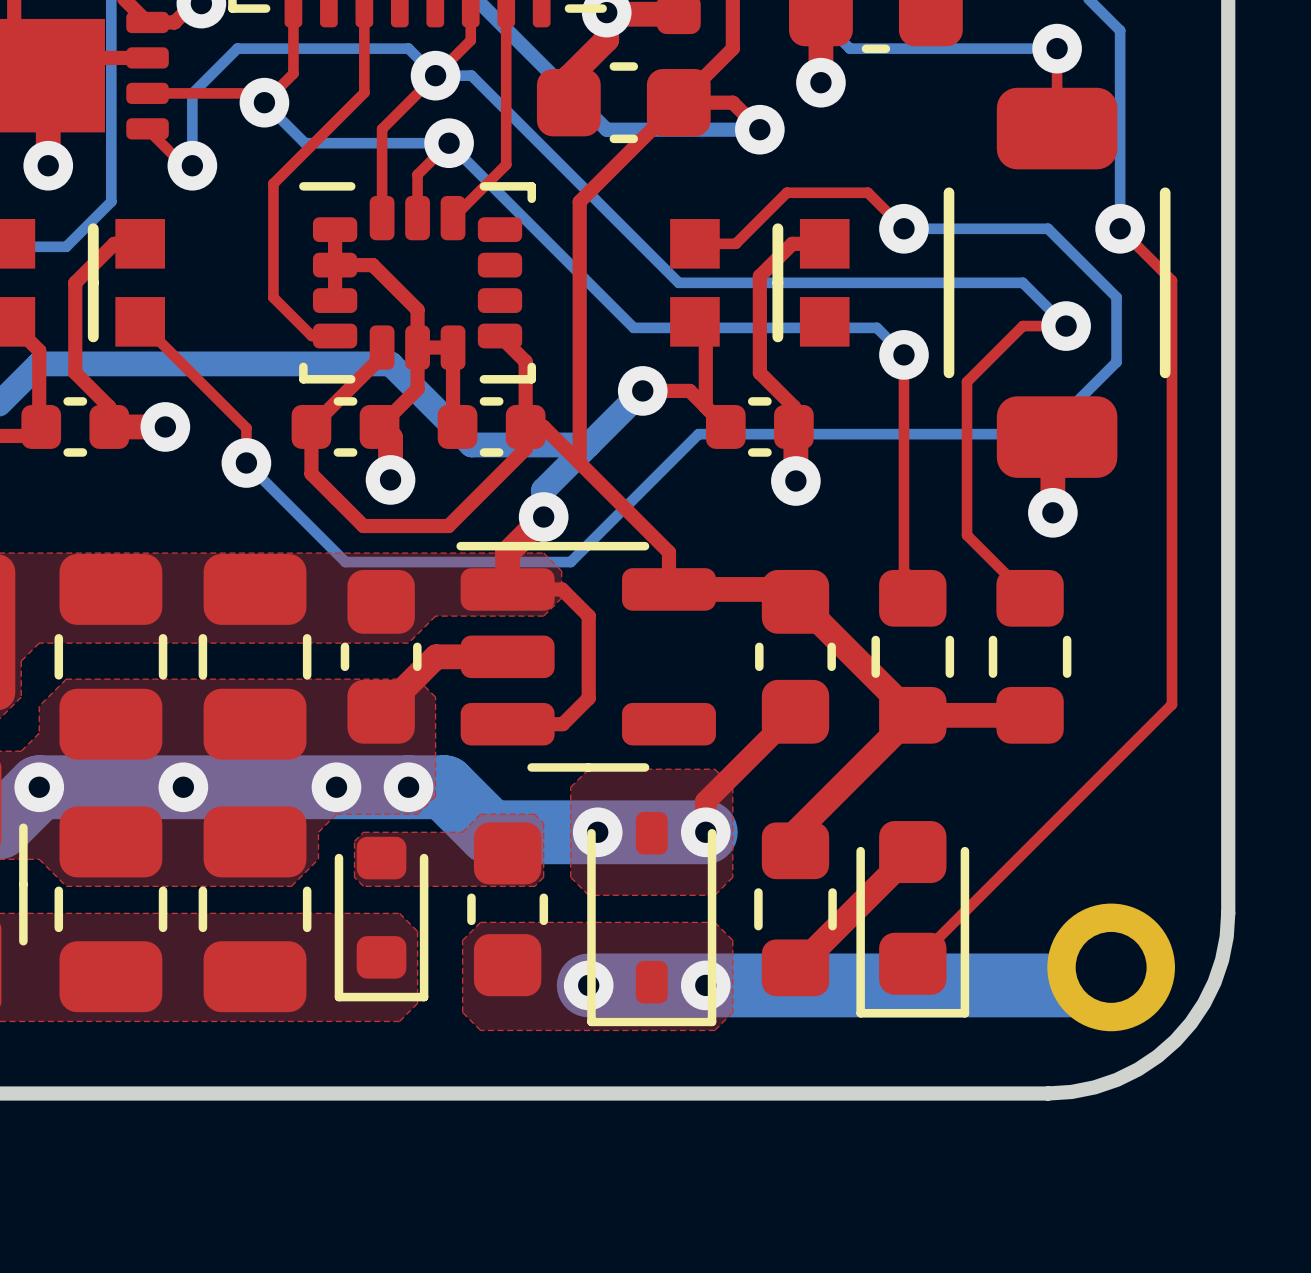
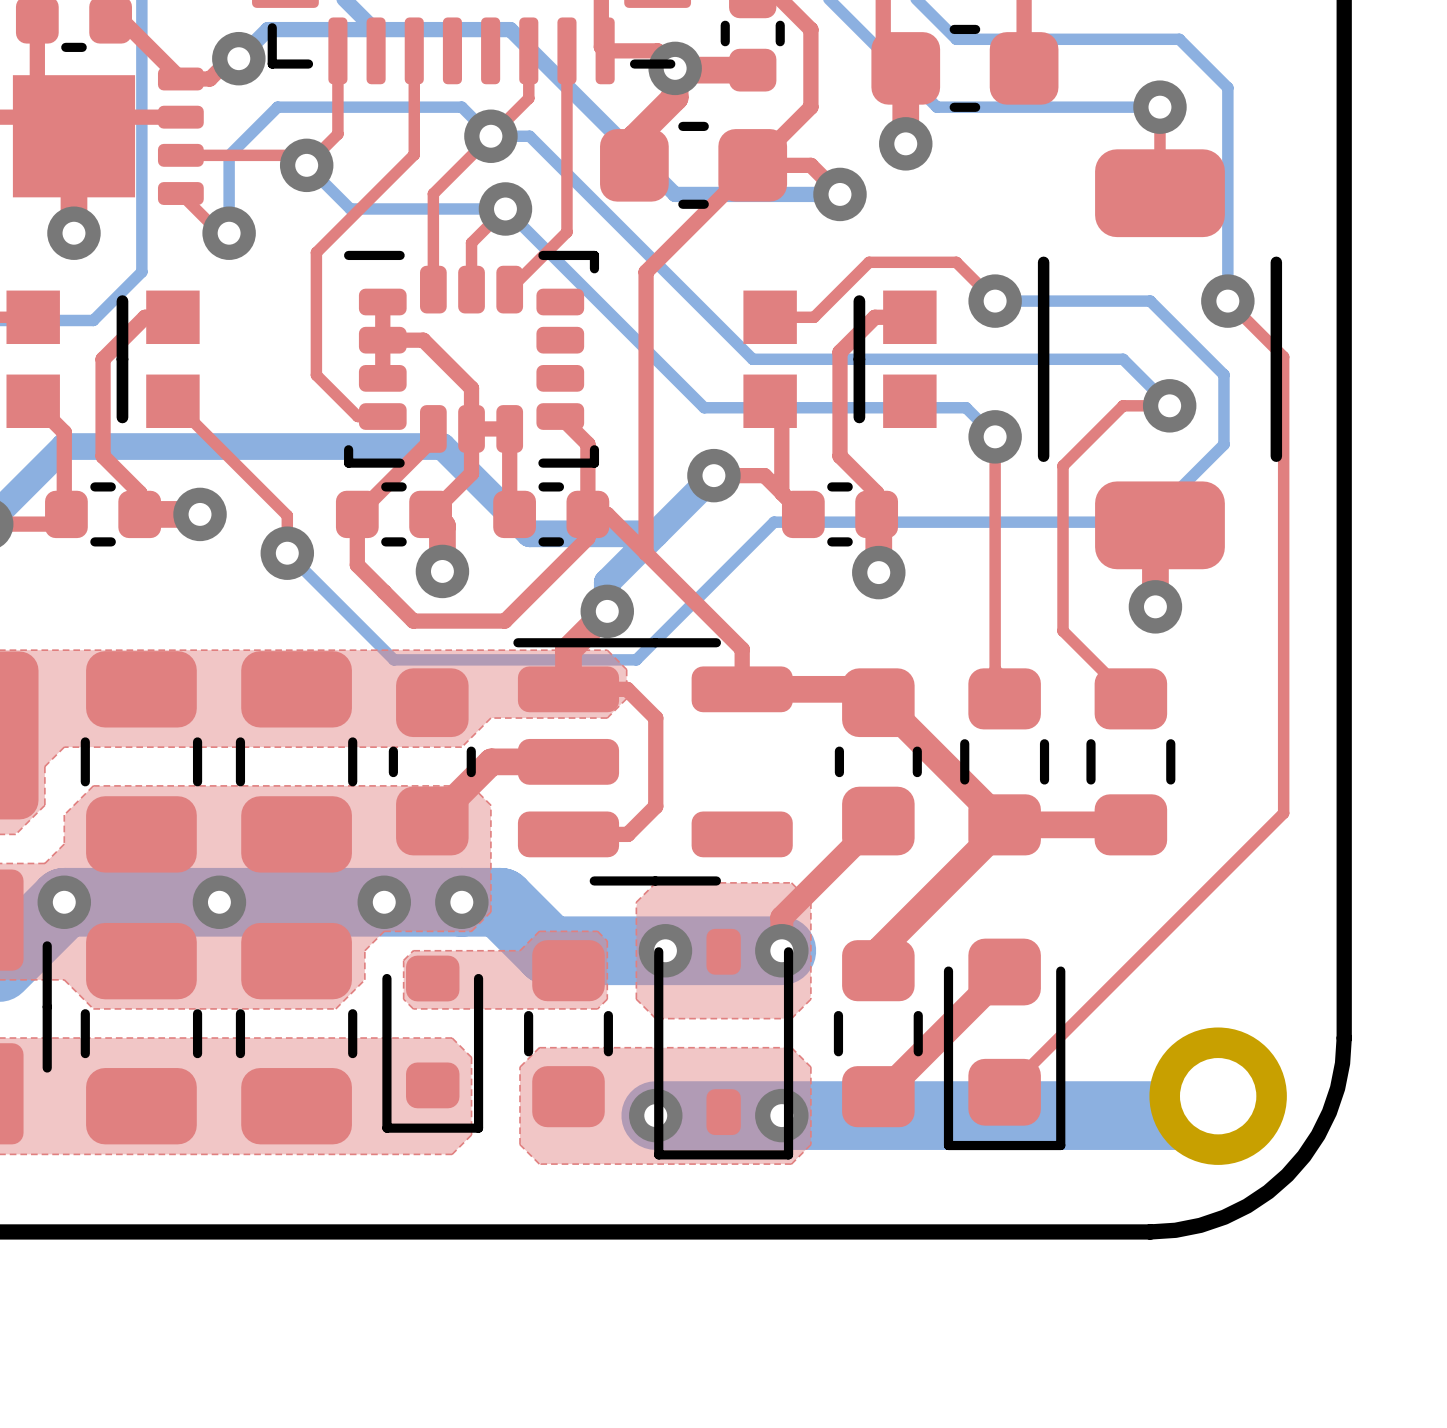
part footprint: [467, 822, 549, 997] -> [524, 940, 613, 1128]

